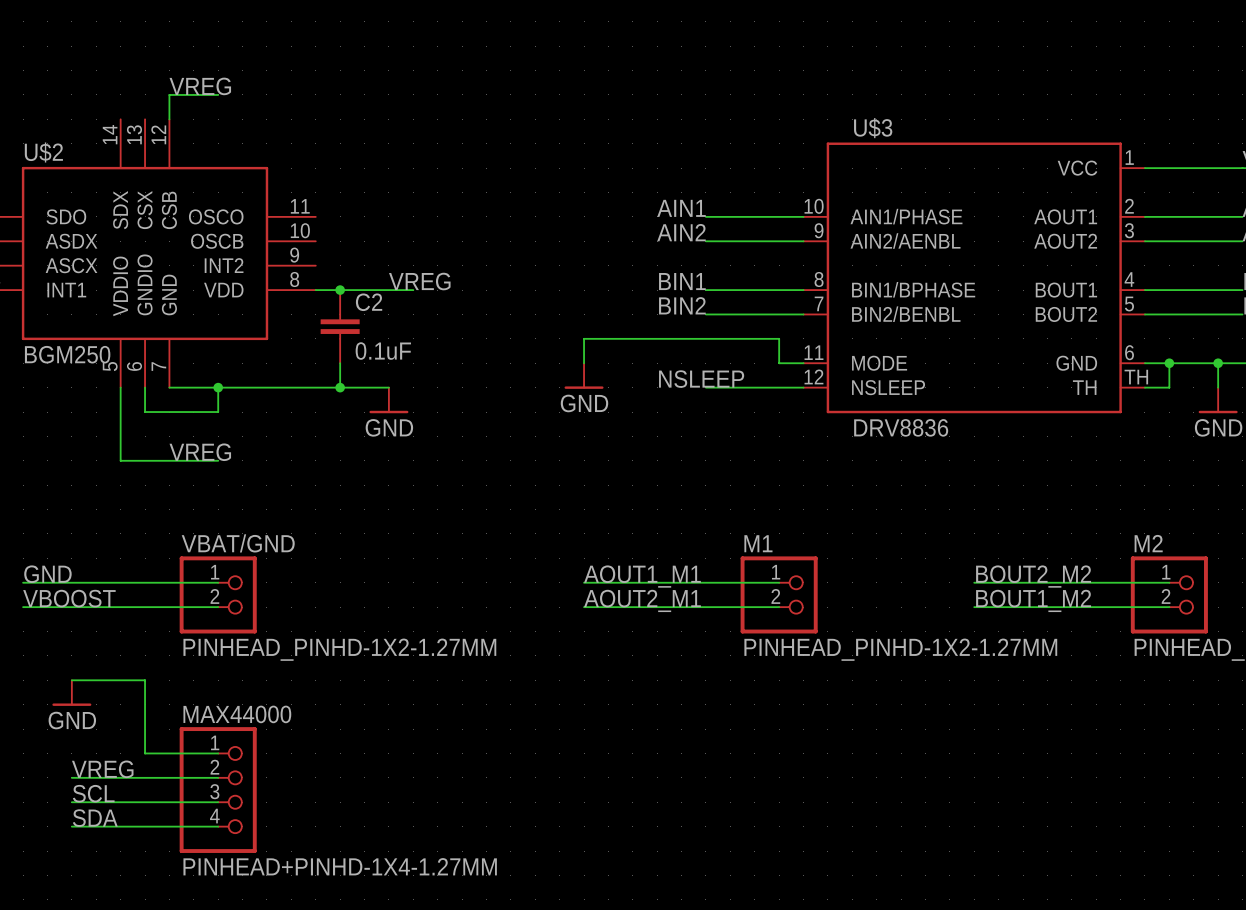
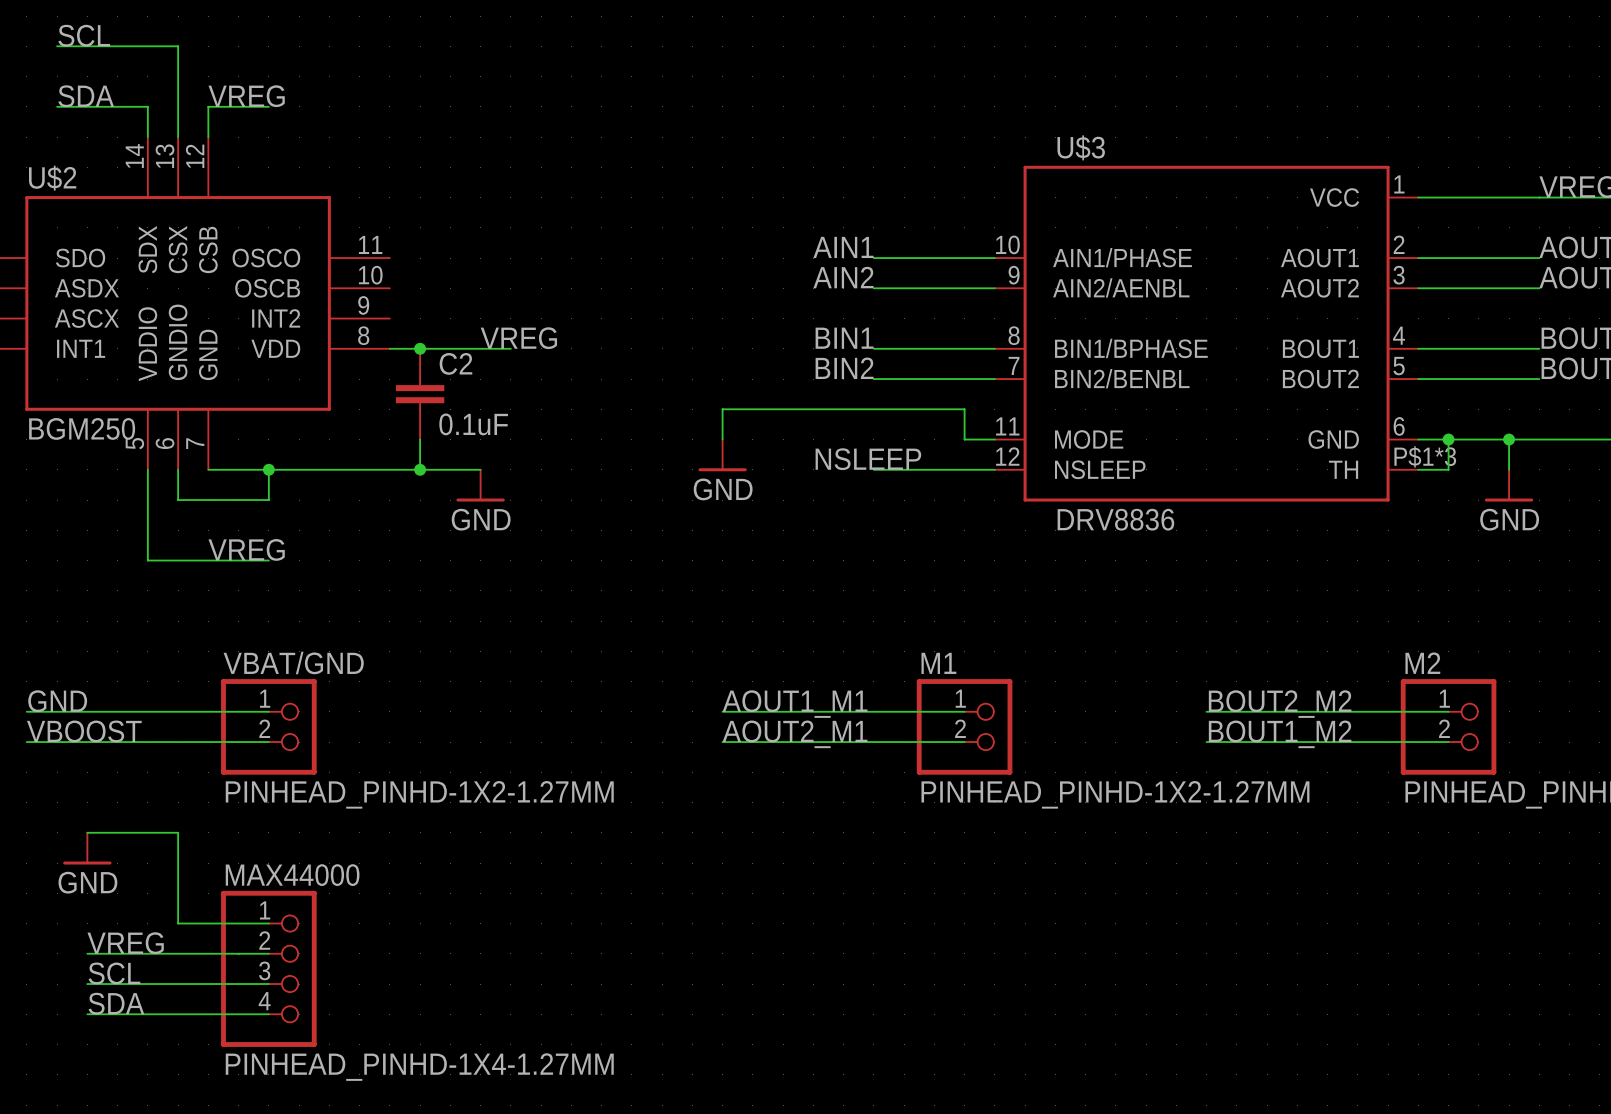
label: none -> SCL (84, 35)
wire: none -> (57, 46) (178, 46) (178, 137)
label: none -> SDA (86, 96)
wire: none -> (57, 106) (147, 106) (147, 137)
U$3 pin number: TH (1136, 377) -> P$1*3 (1425, 456)
MAX44000 value: PINHEAD+PINHD-1X4-1.27MM (340, 866) -> PINHEAD_PINHD-1X4-1.27MM (419, 1067)

